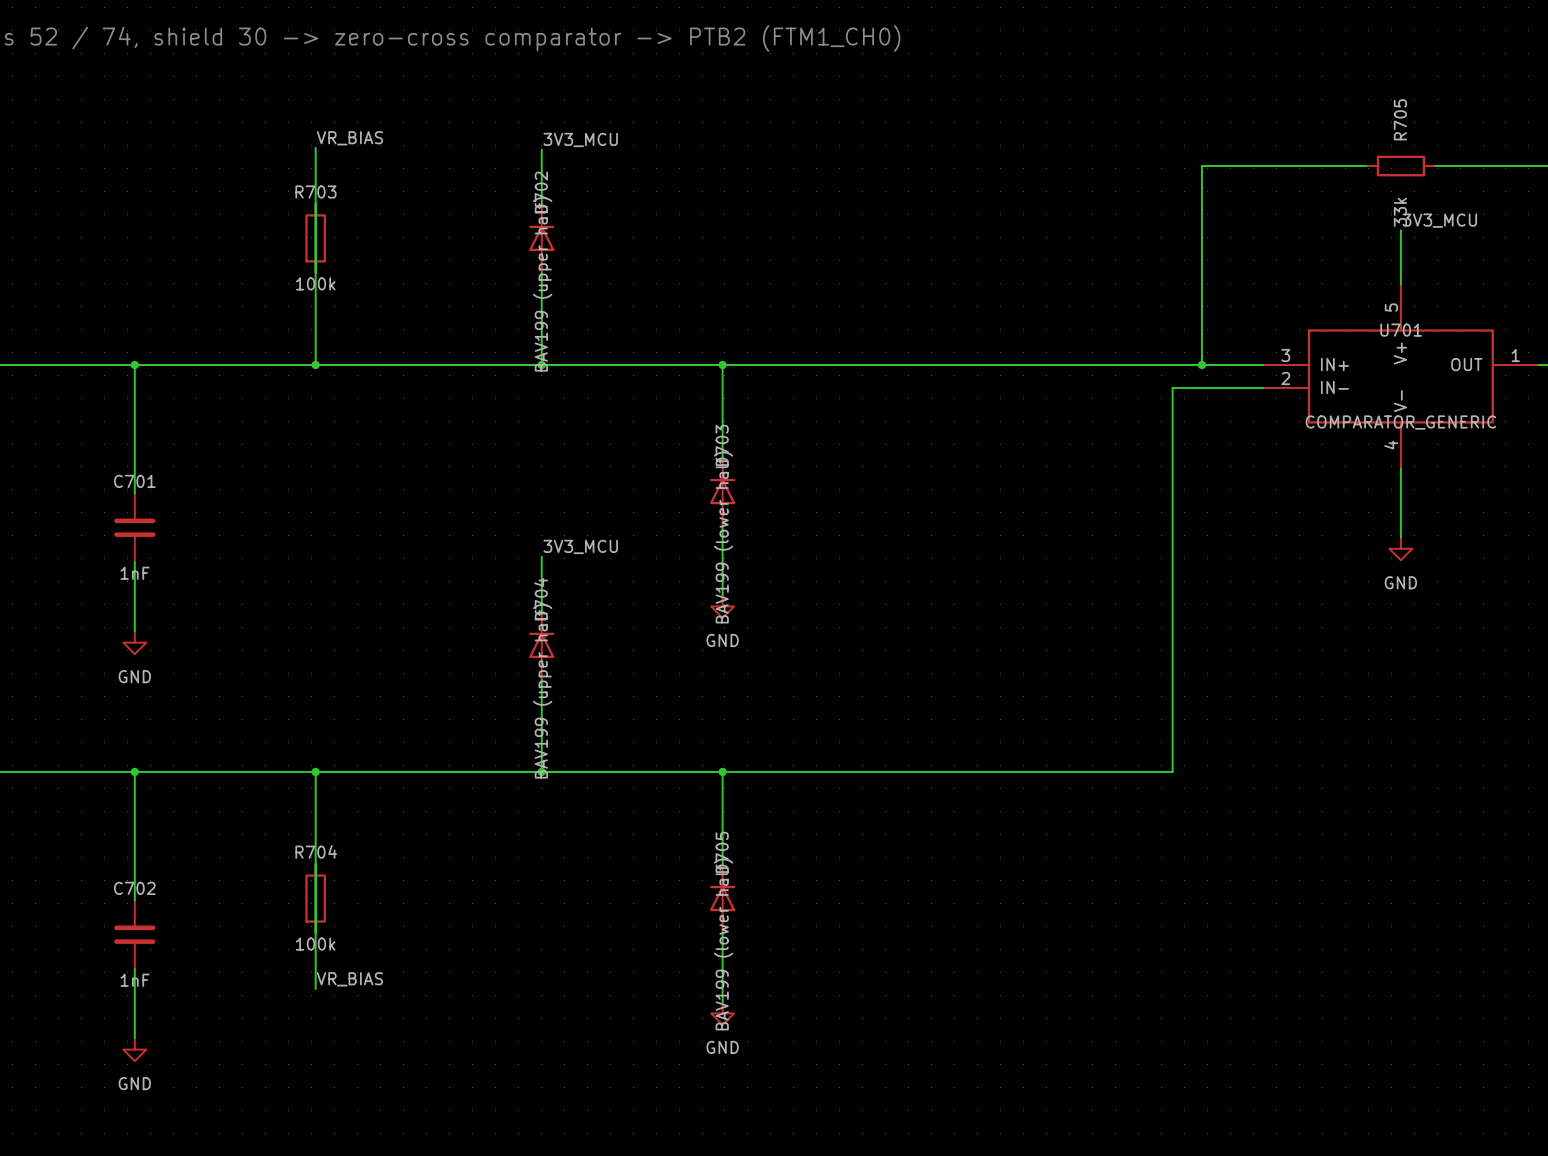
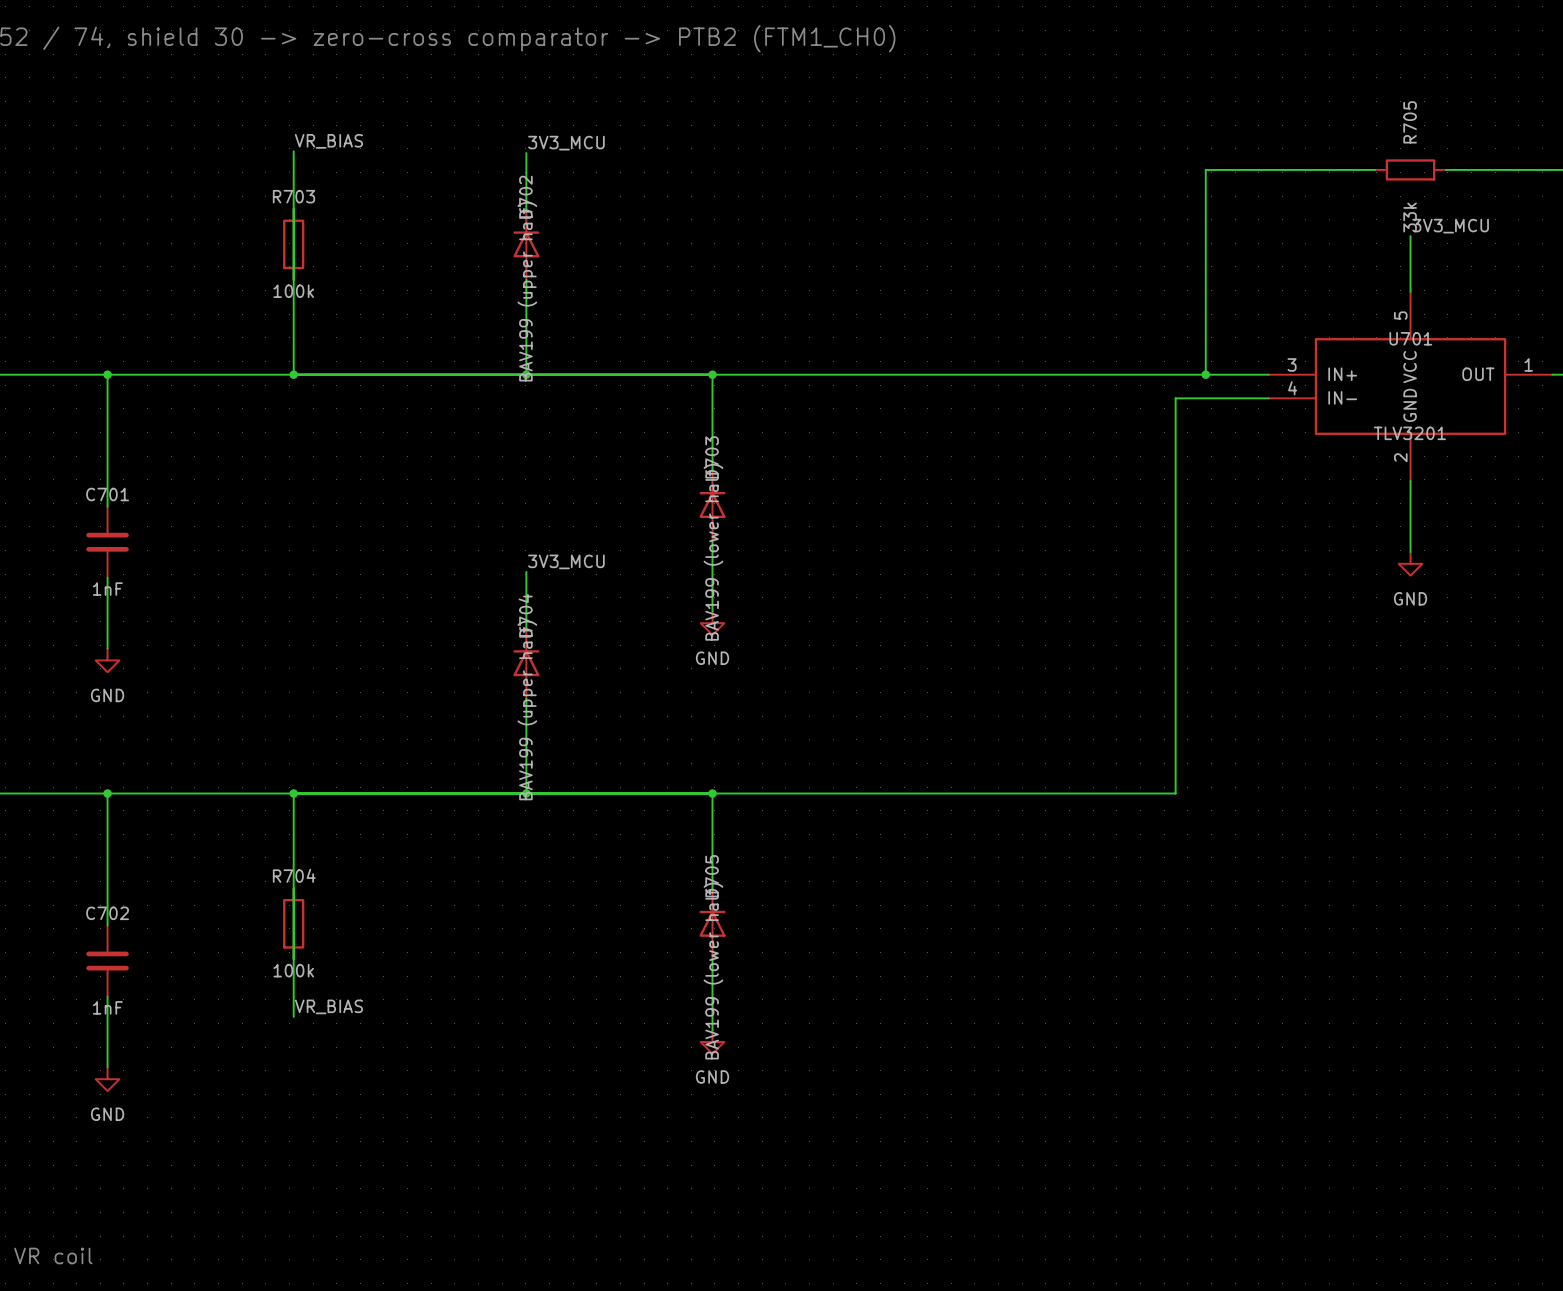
U701 pin name: V+ (1400, 353) -> VCC (1410, 367)
U701 pin number: 2 (1285, 378) -> 4 (1292, 388)
U701 pin name: V- (1400, 401) -> GND (1410, 405)
U701 value: COMPARATOR_GENERIC (1400, 422) -> TLV3201 (1409, 433)
U701 pin number: 4 (1391, 445) -> 2 (1400, 457)

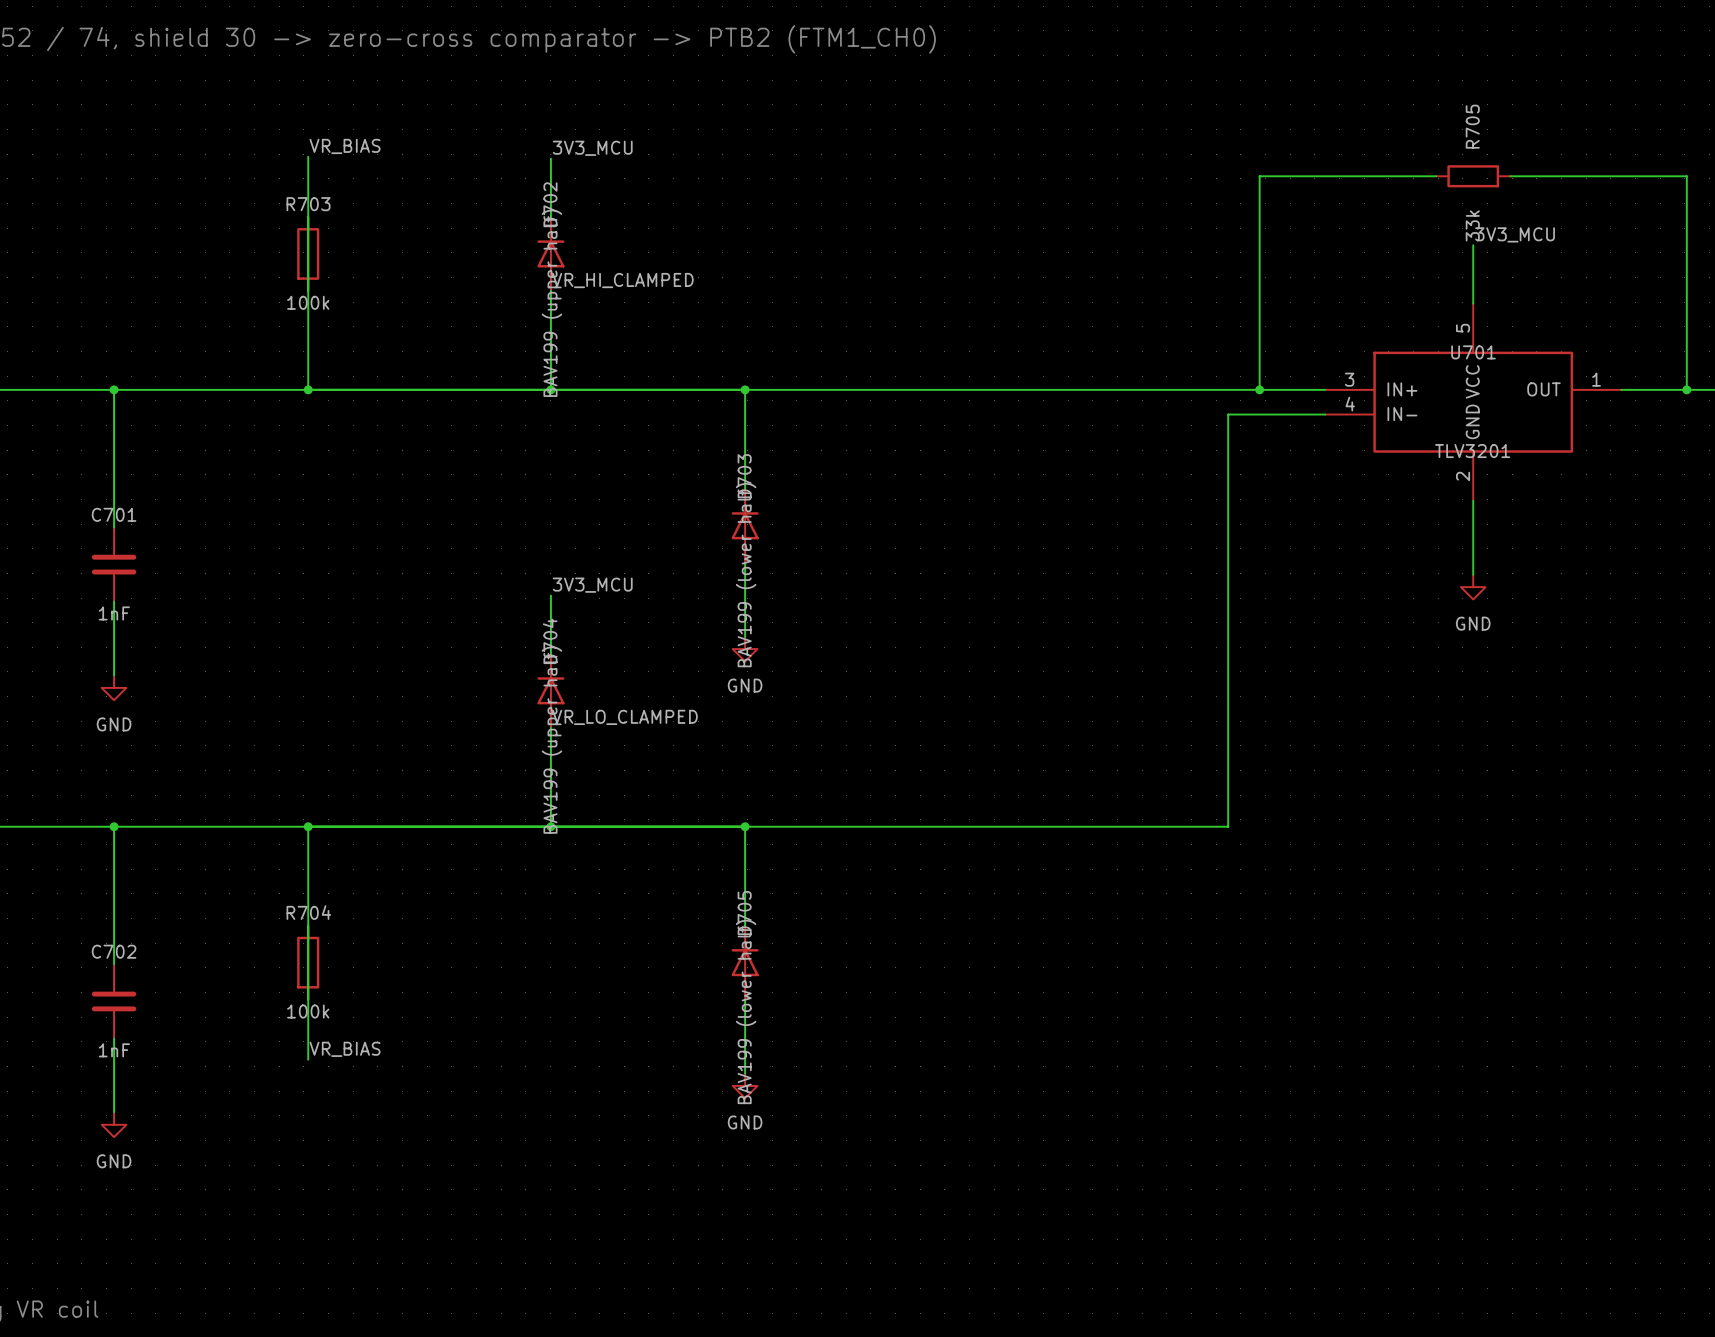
label: none -> VR_HI_CLAMPED (622, 280)
label: none -> VR_LO_CLAMPED (625, 717)

